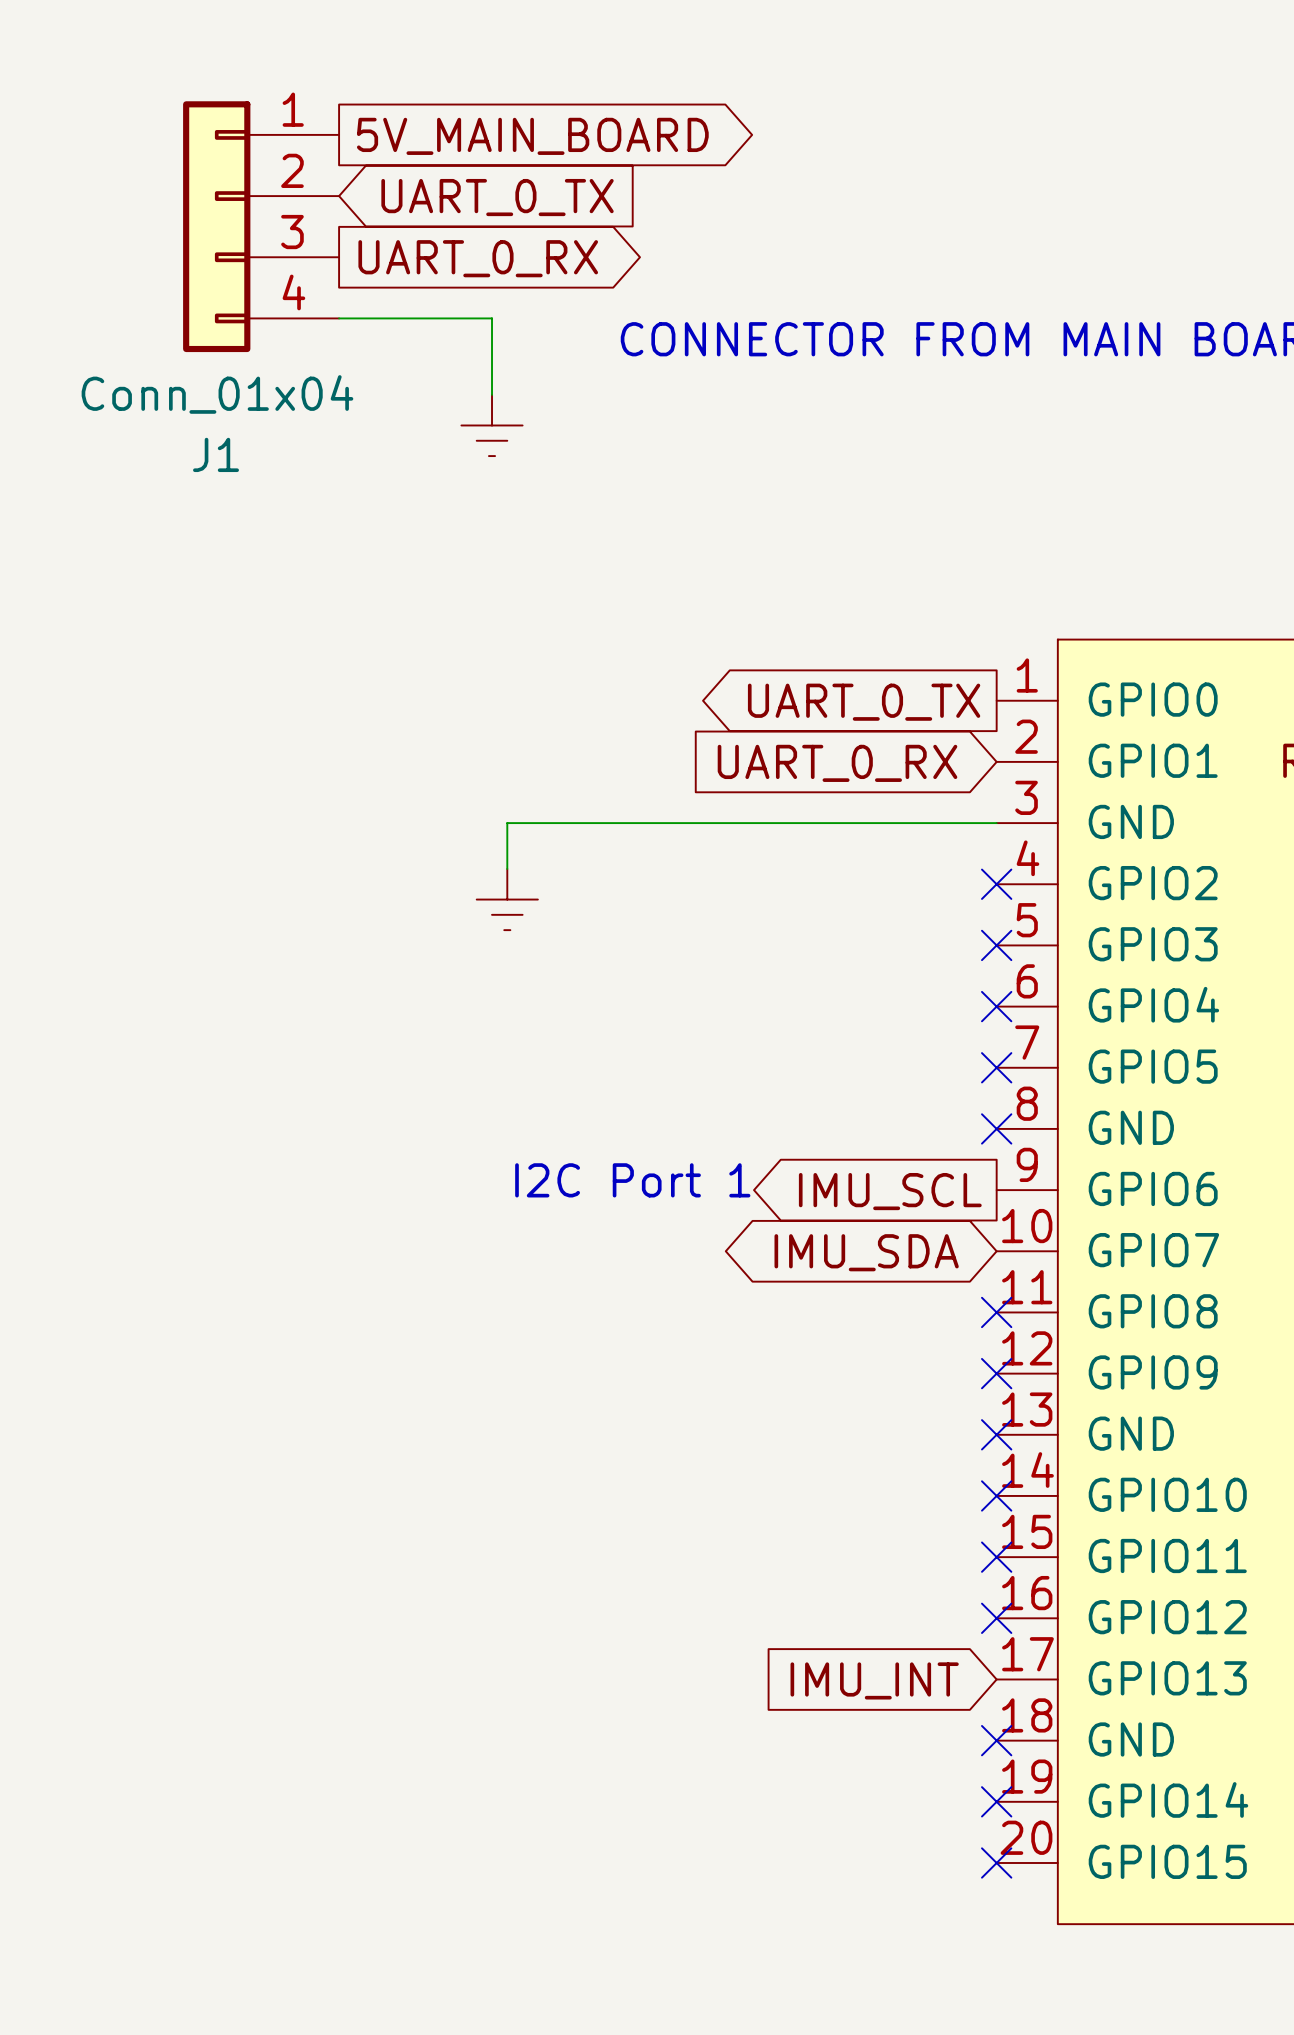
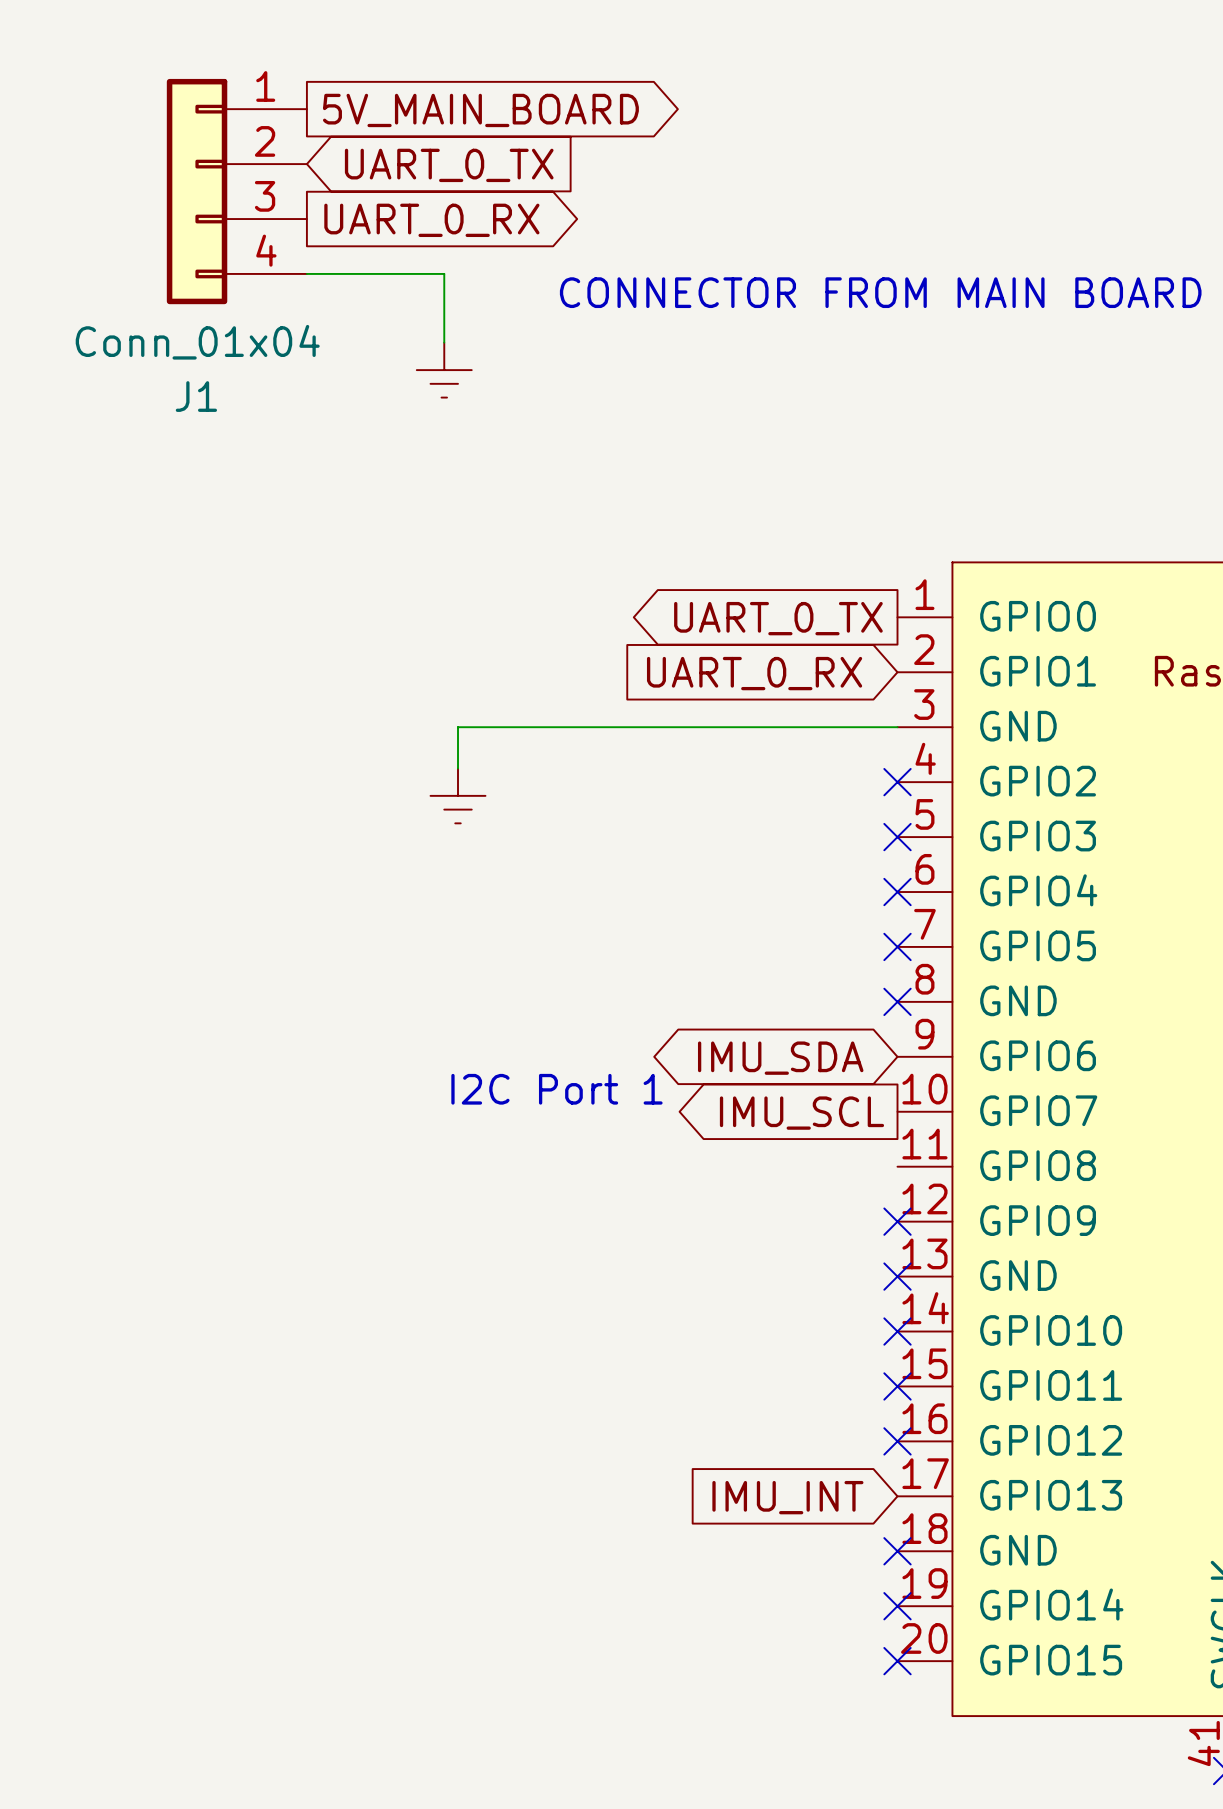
text position: I2C Port 1 (632, 1180) -> I2C Port 1 (556, 1089)
global label shape: output (890, 1191) -> bidirectional (780, 1058)
global label: IMU_SCL (890, 1191) -> IMU_SDA (780, 1058)
global label shape: bidirectional (866, 1252) -> output (801, 1113)
global label: IMU_SDA (866, 1252) -> IMU_SCL (801, 1113)
no-connect mark: (996, 1312) -> none

